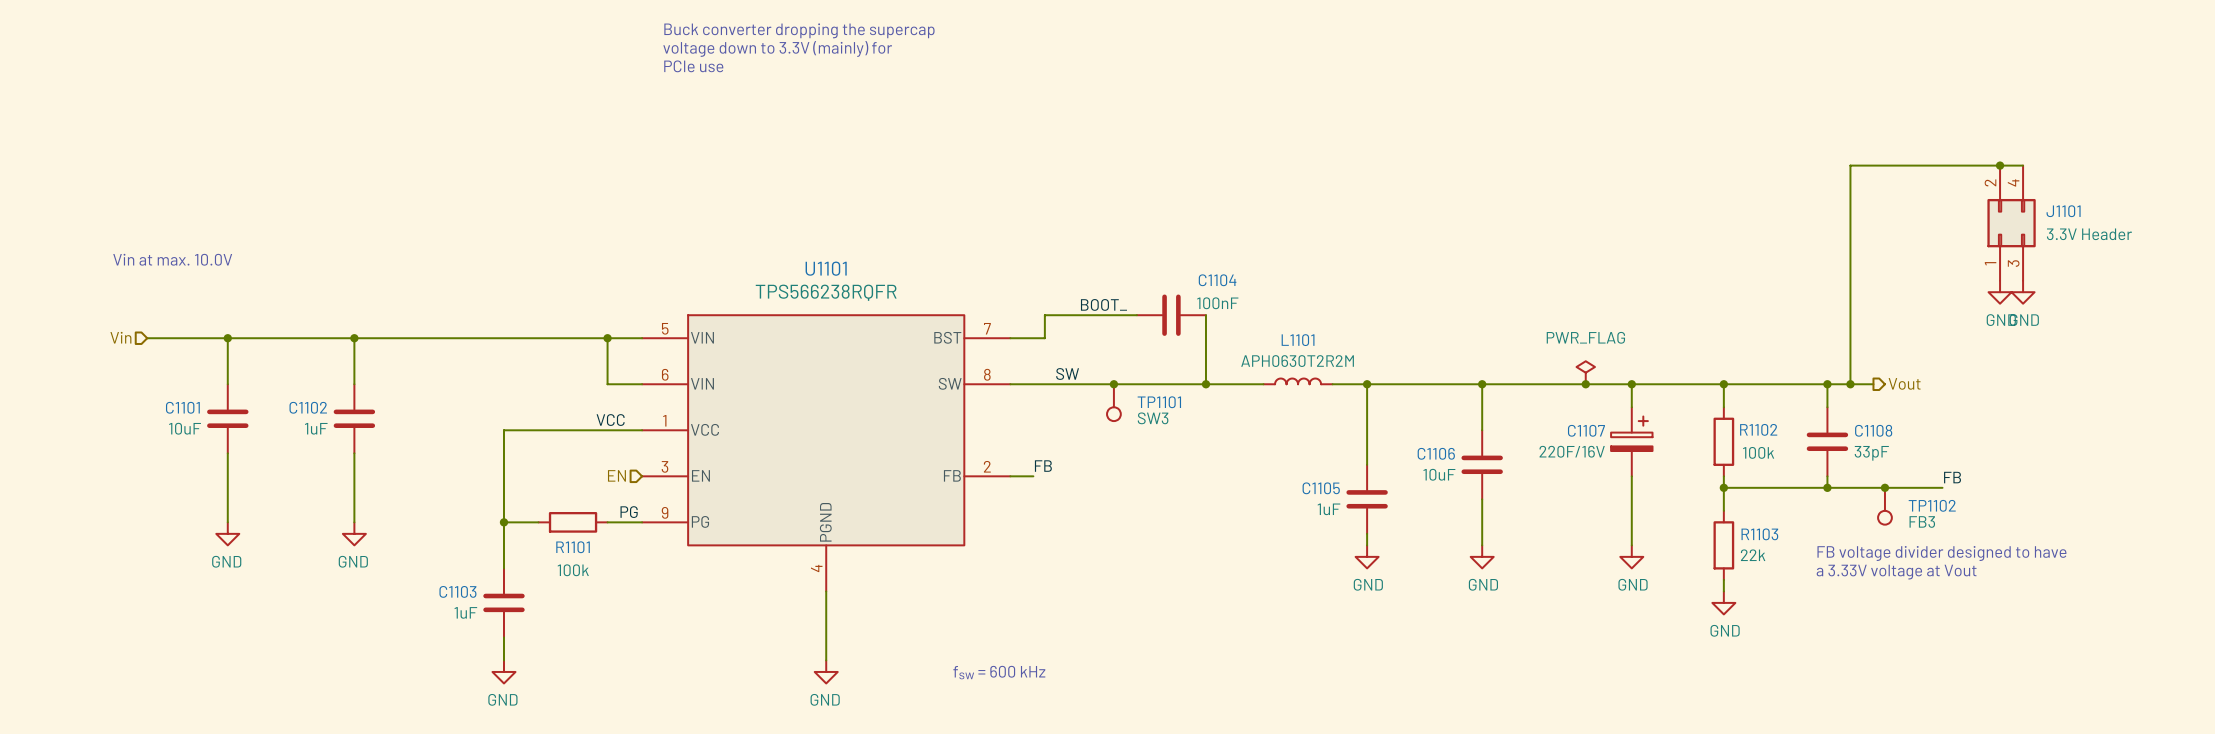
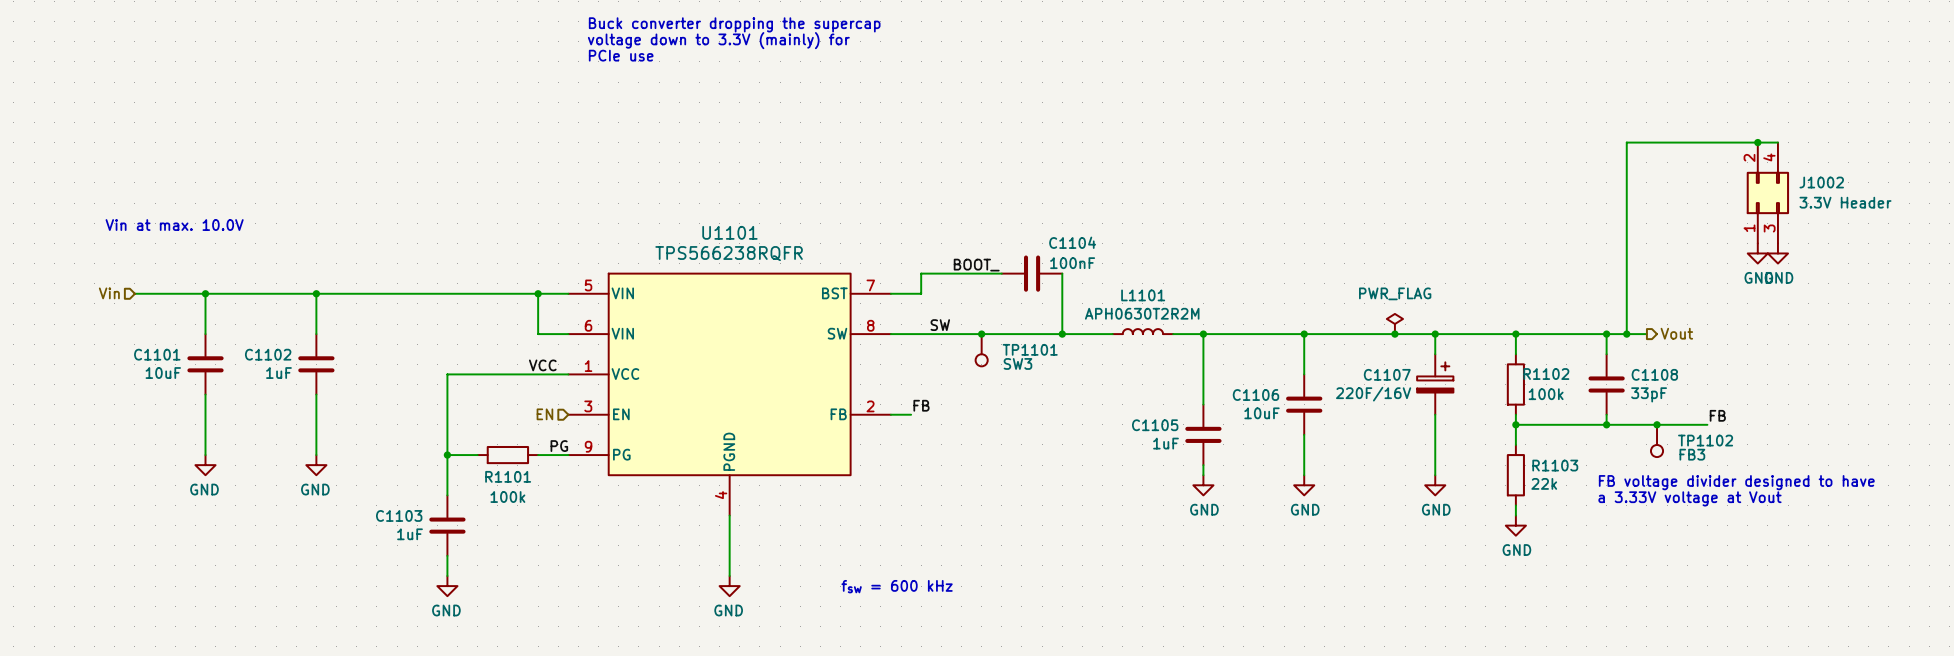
J1101 name: J1101 (2063, 211) -> J1002 (1821, 182)

